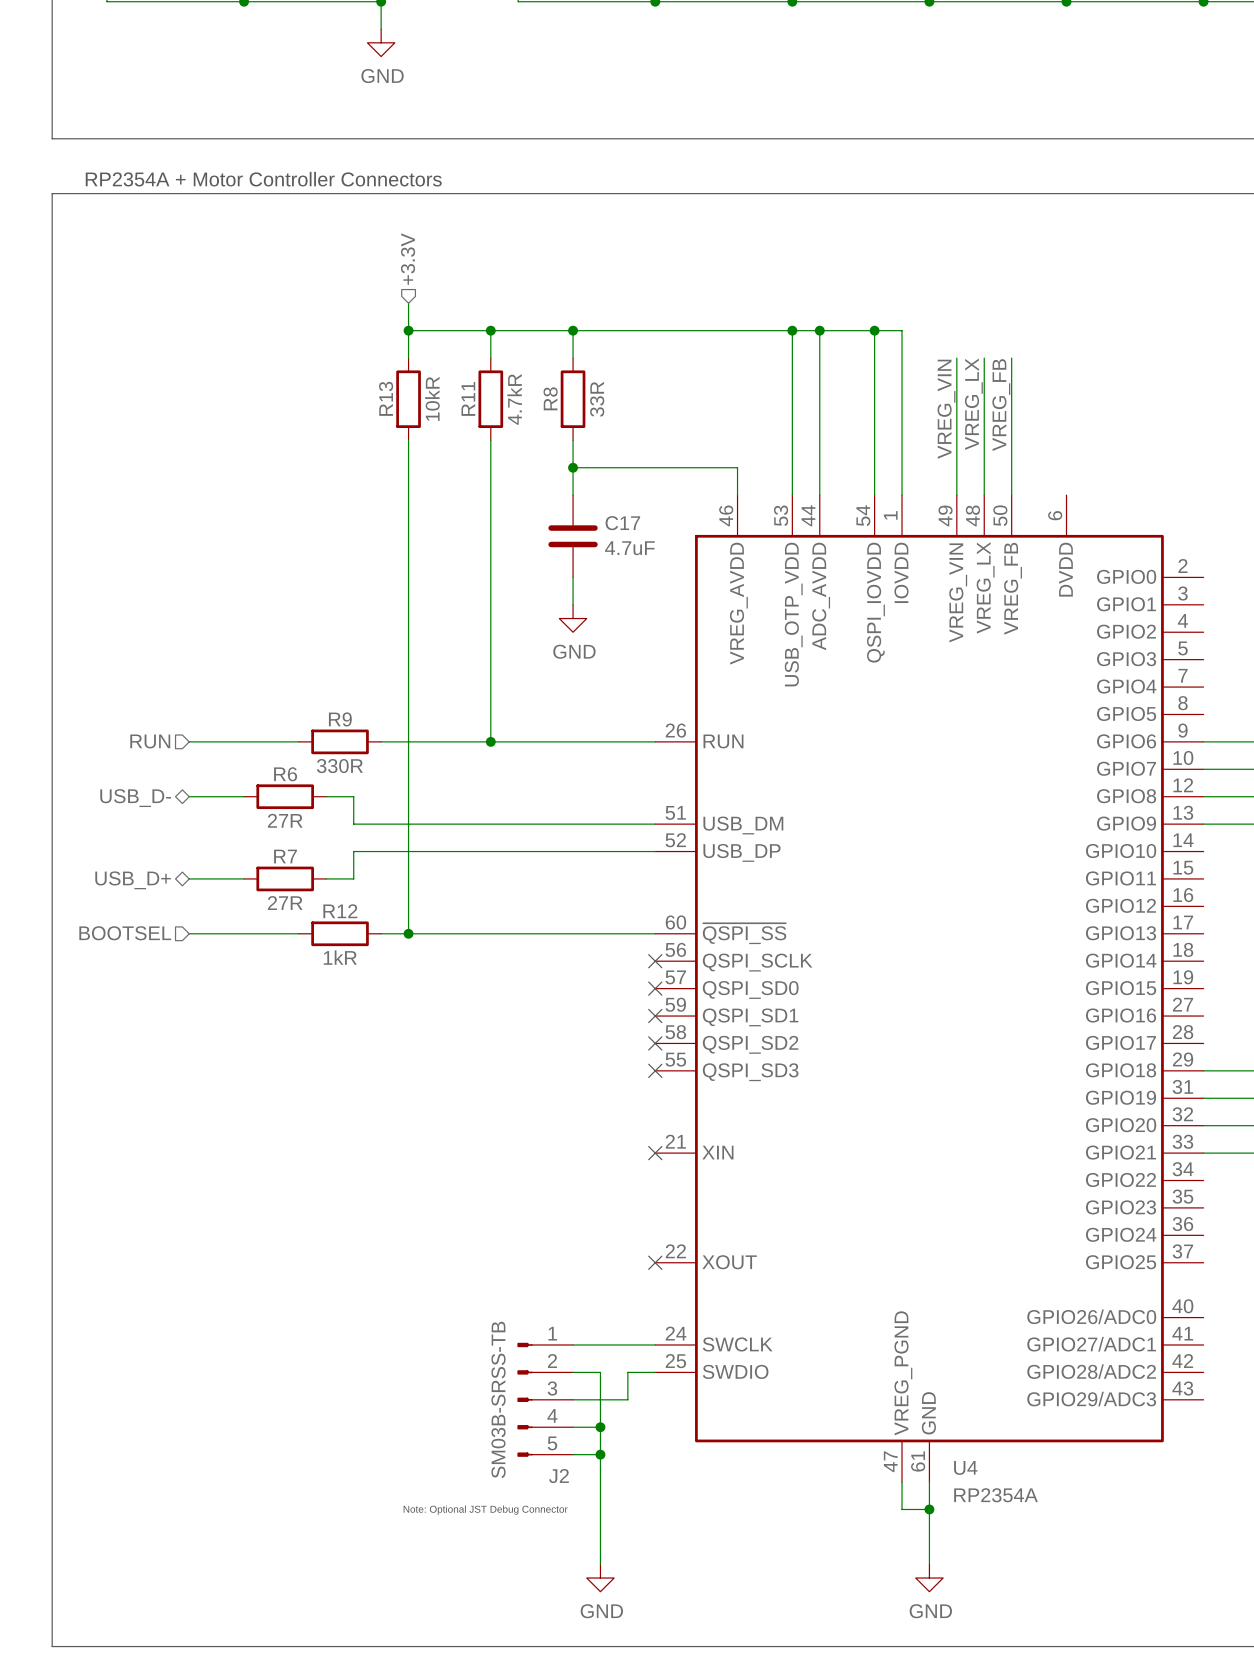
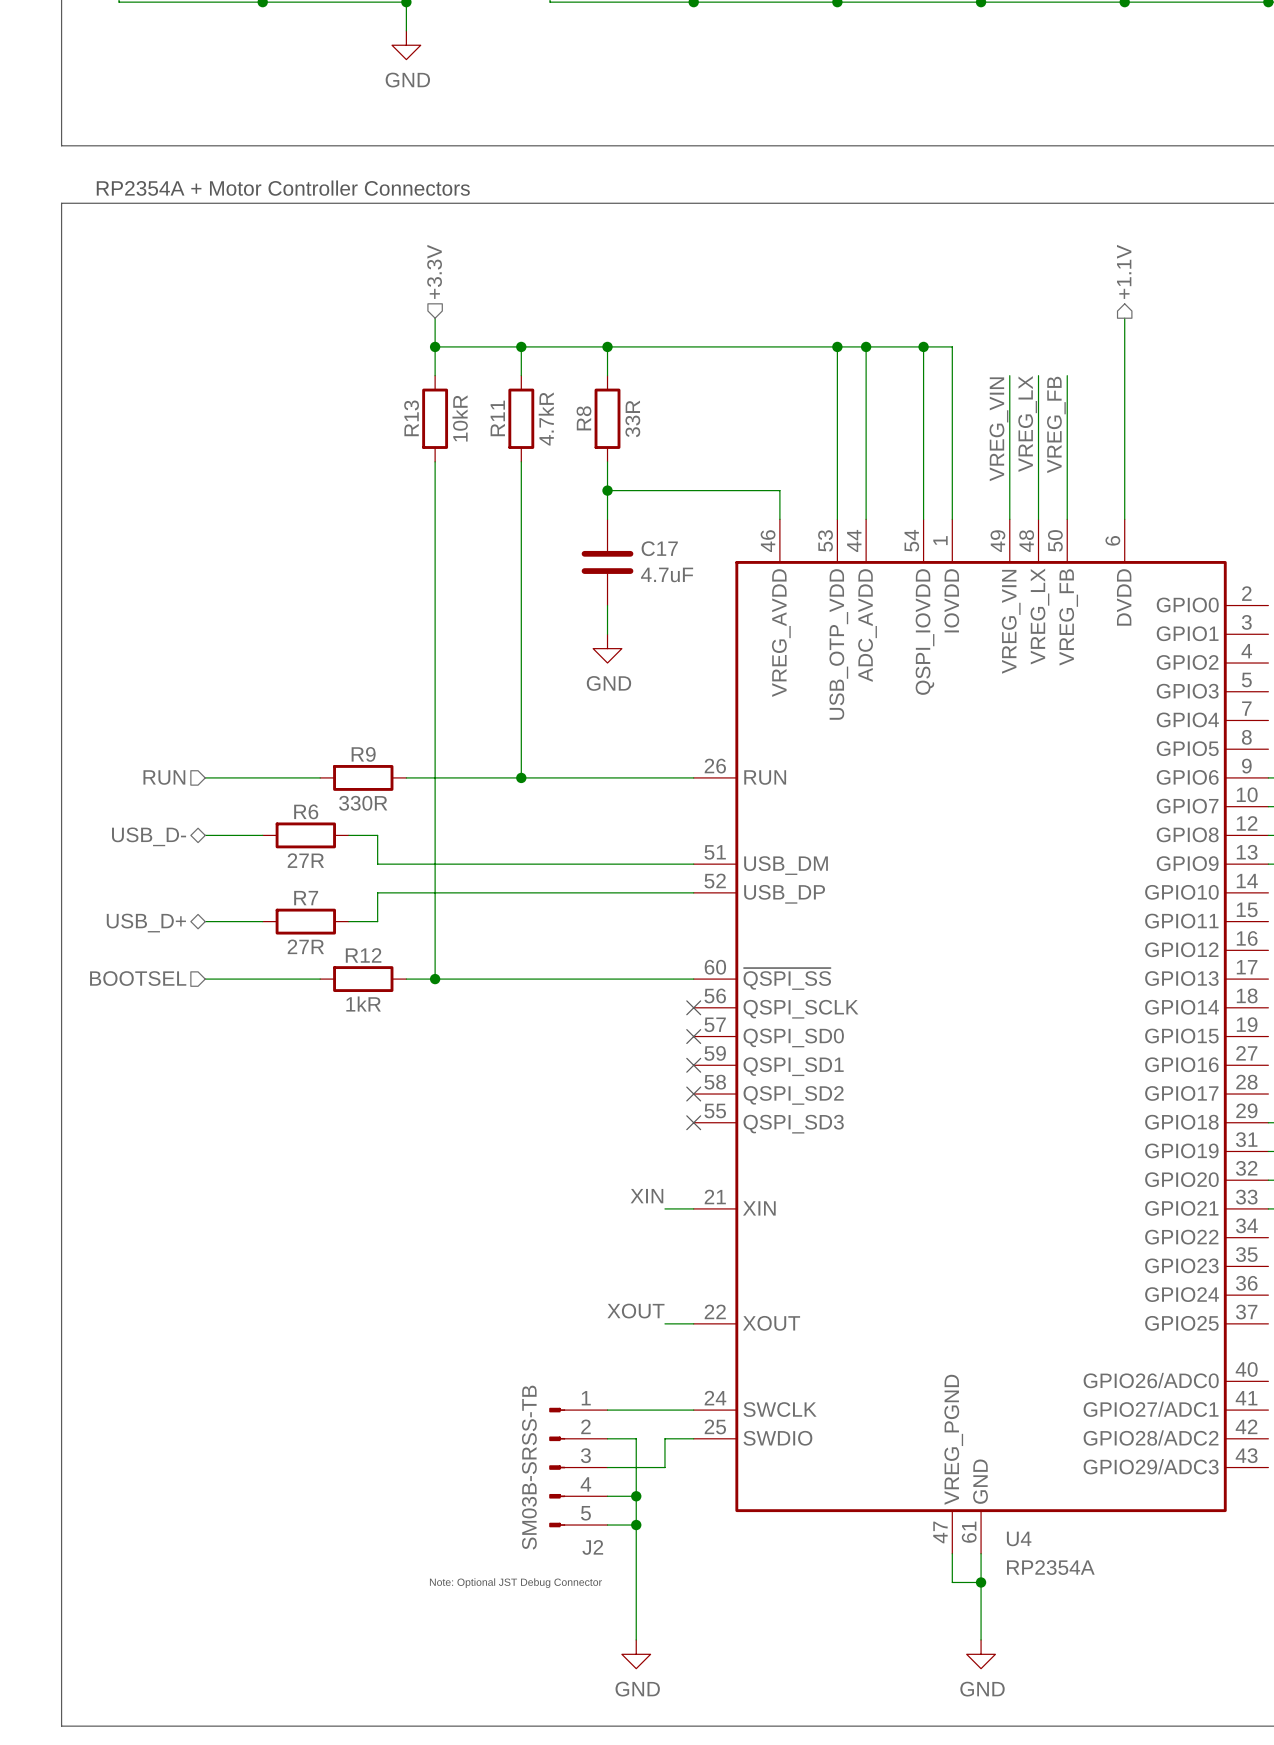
hierarchical label: none -> +1.1V (1124, 271)
wire: none -> (1124, 318) (1124, 519)
label: none -> XIN (646, 1196)
wire: none -> (664, 1208) (693, 1208)
no-connect mark: (655, 1153) -> none
label: none -> XOUT (635, 1311)
wire: none -> (664, 1323) (693, 1323)
no-connect mark: (655, 1262) -> none

